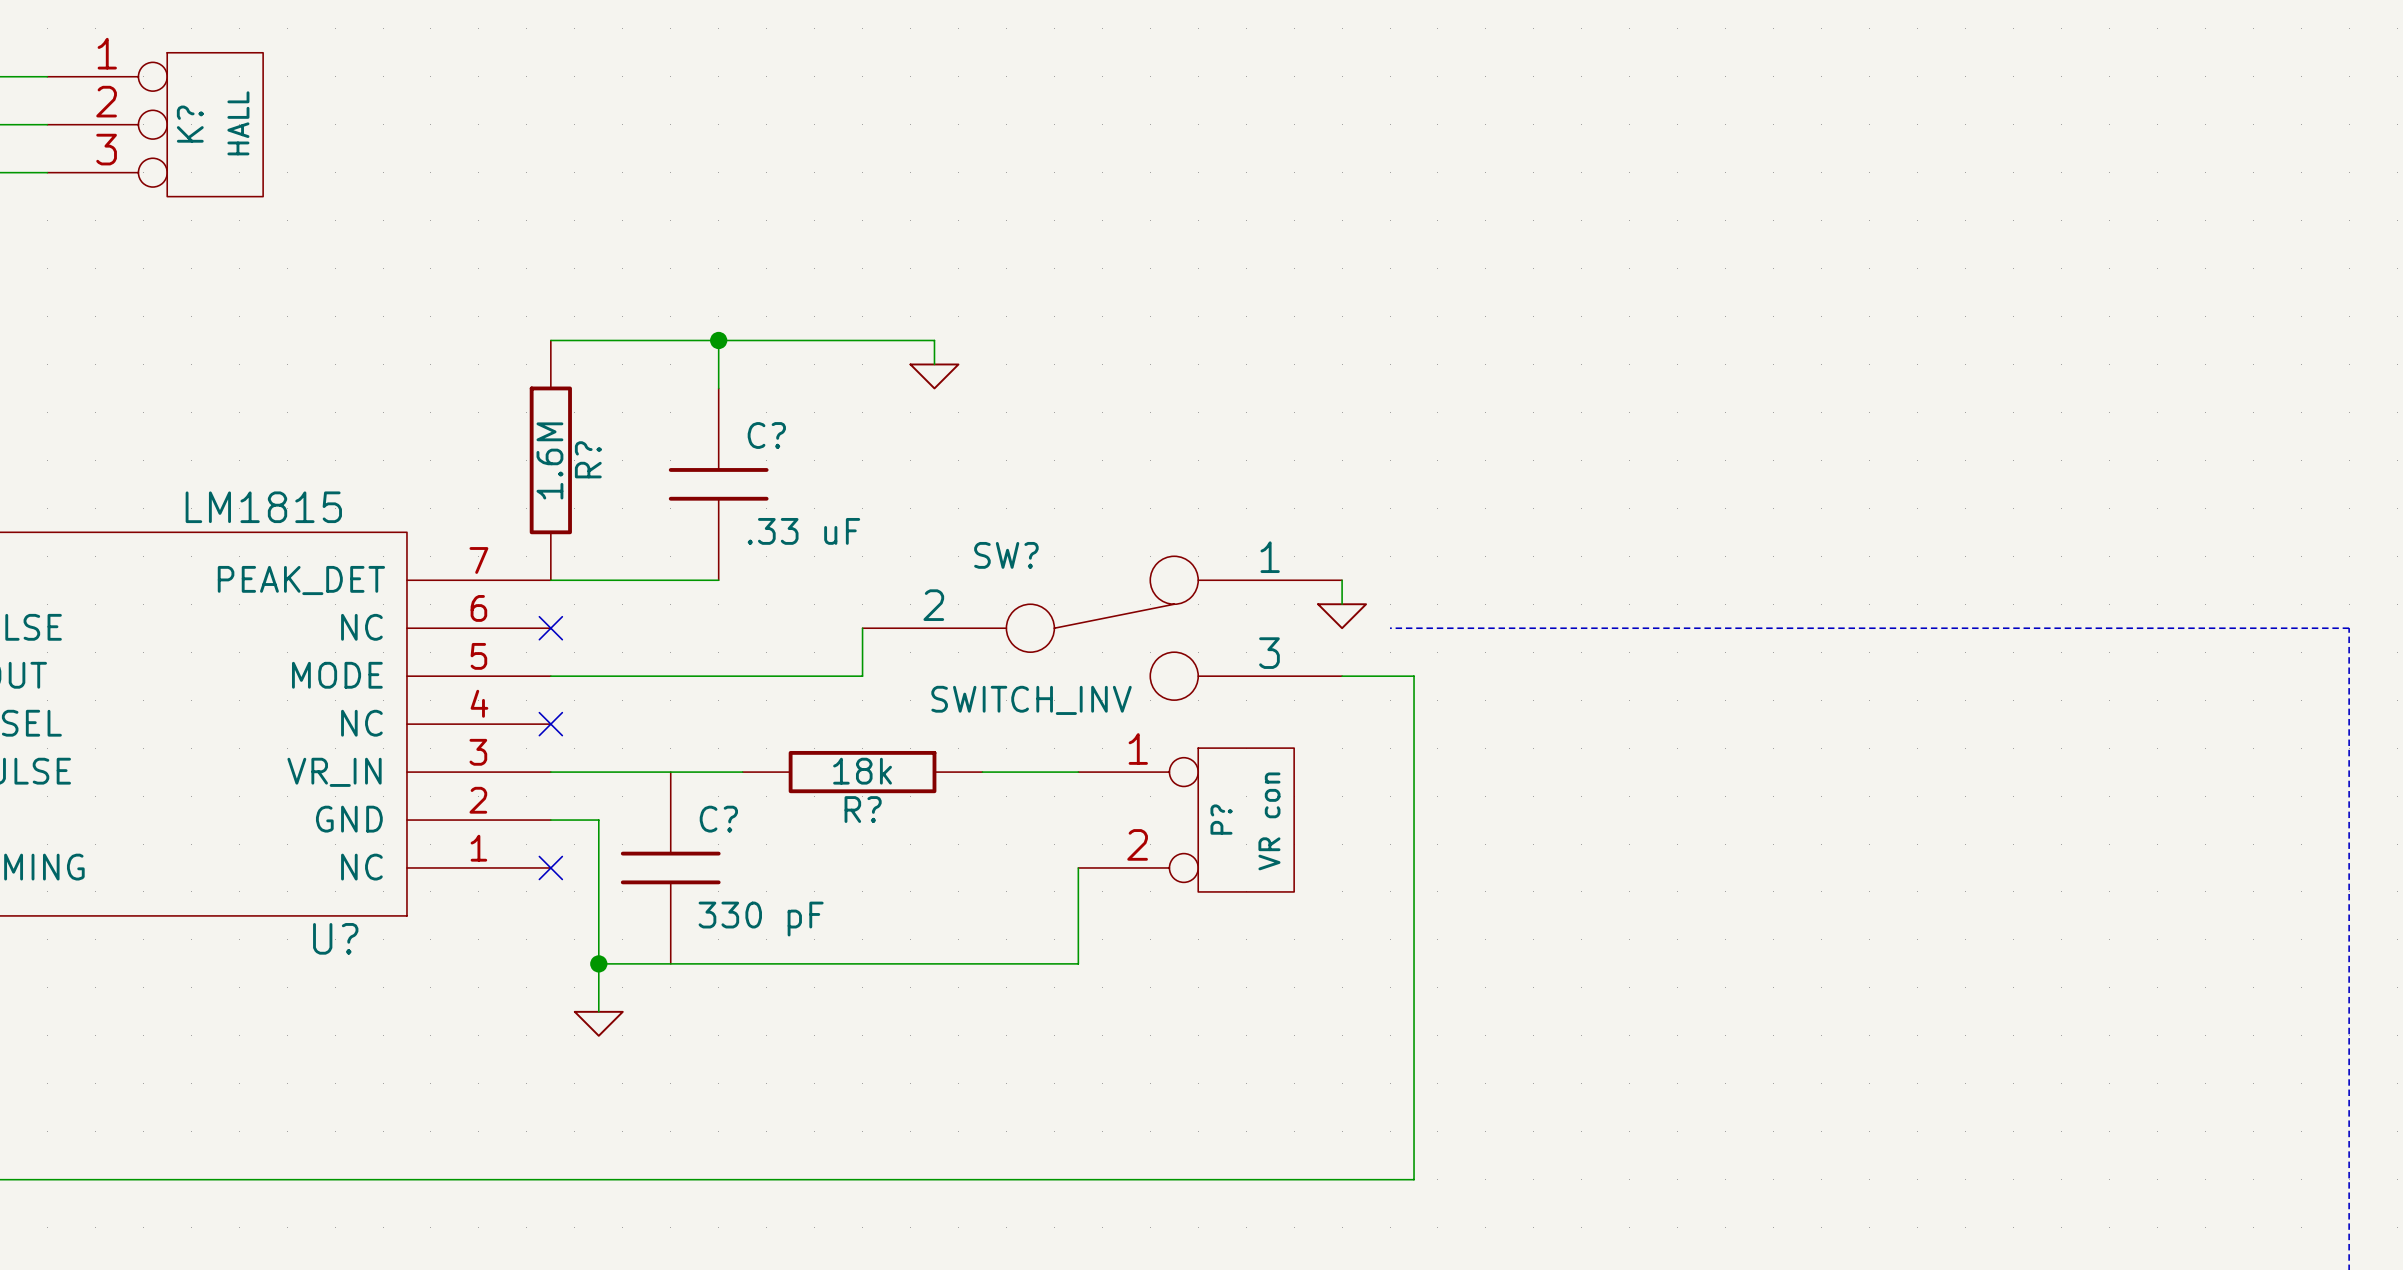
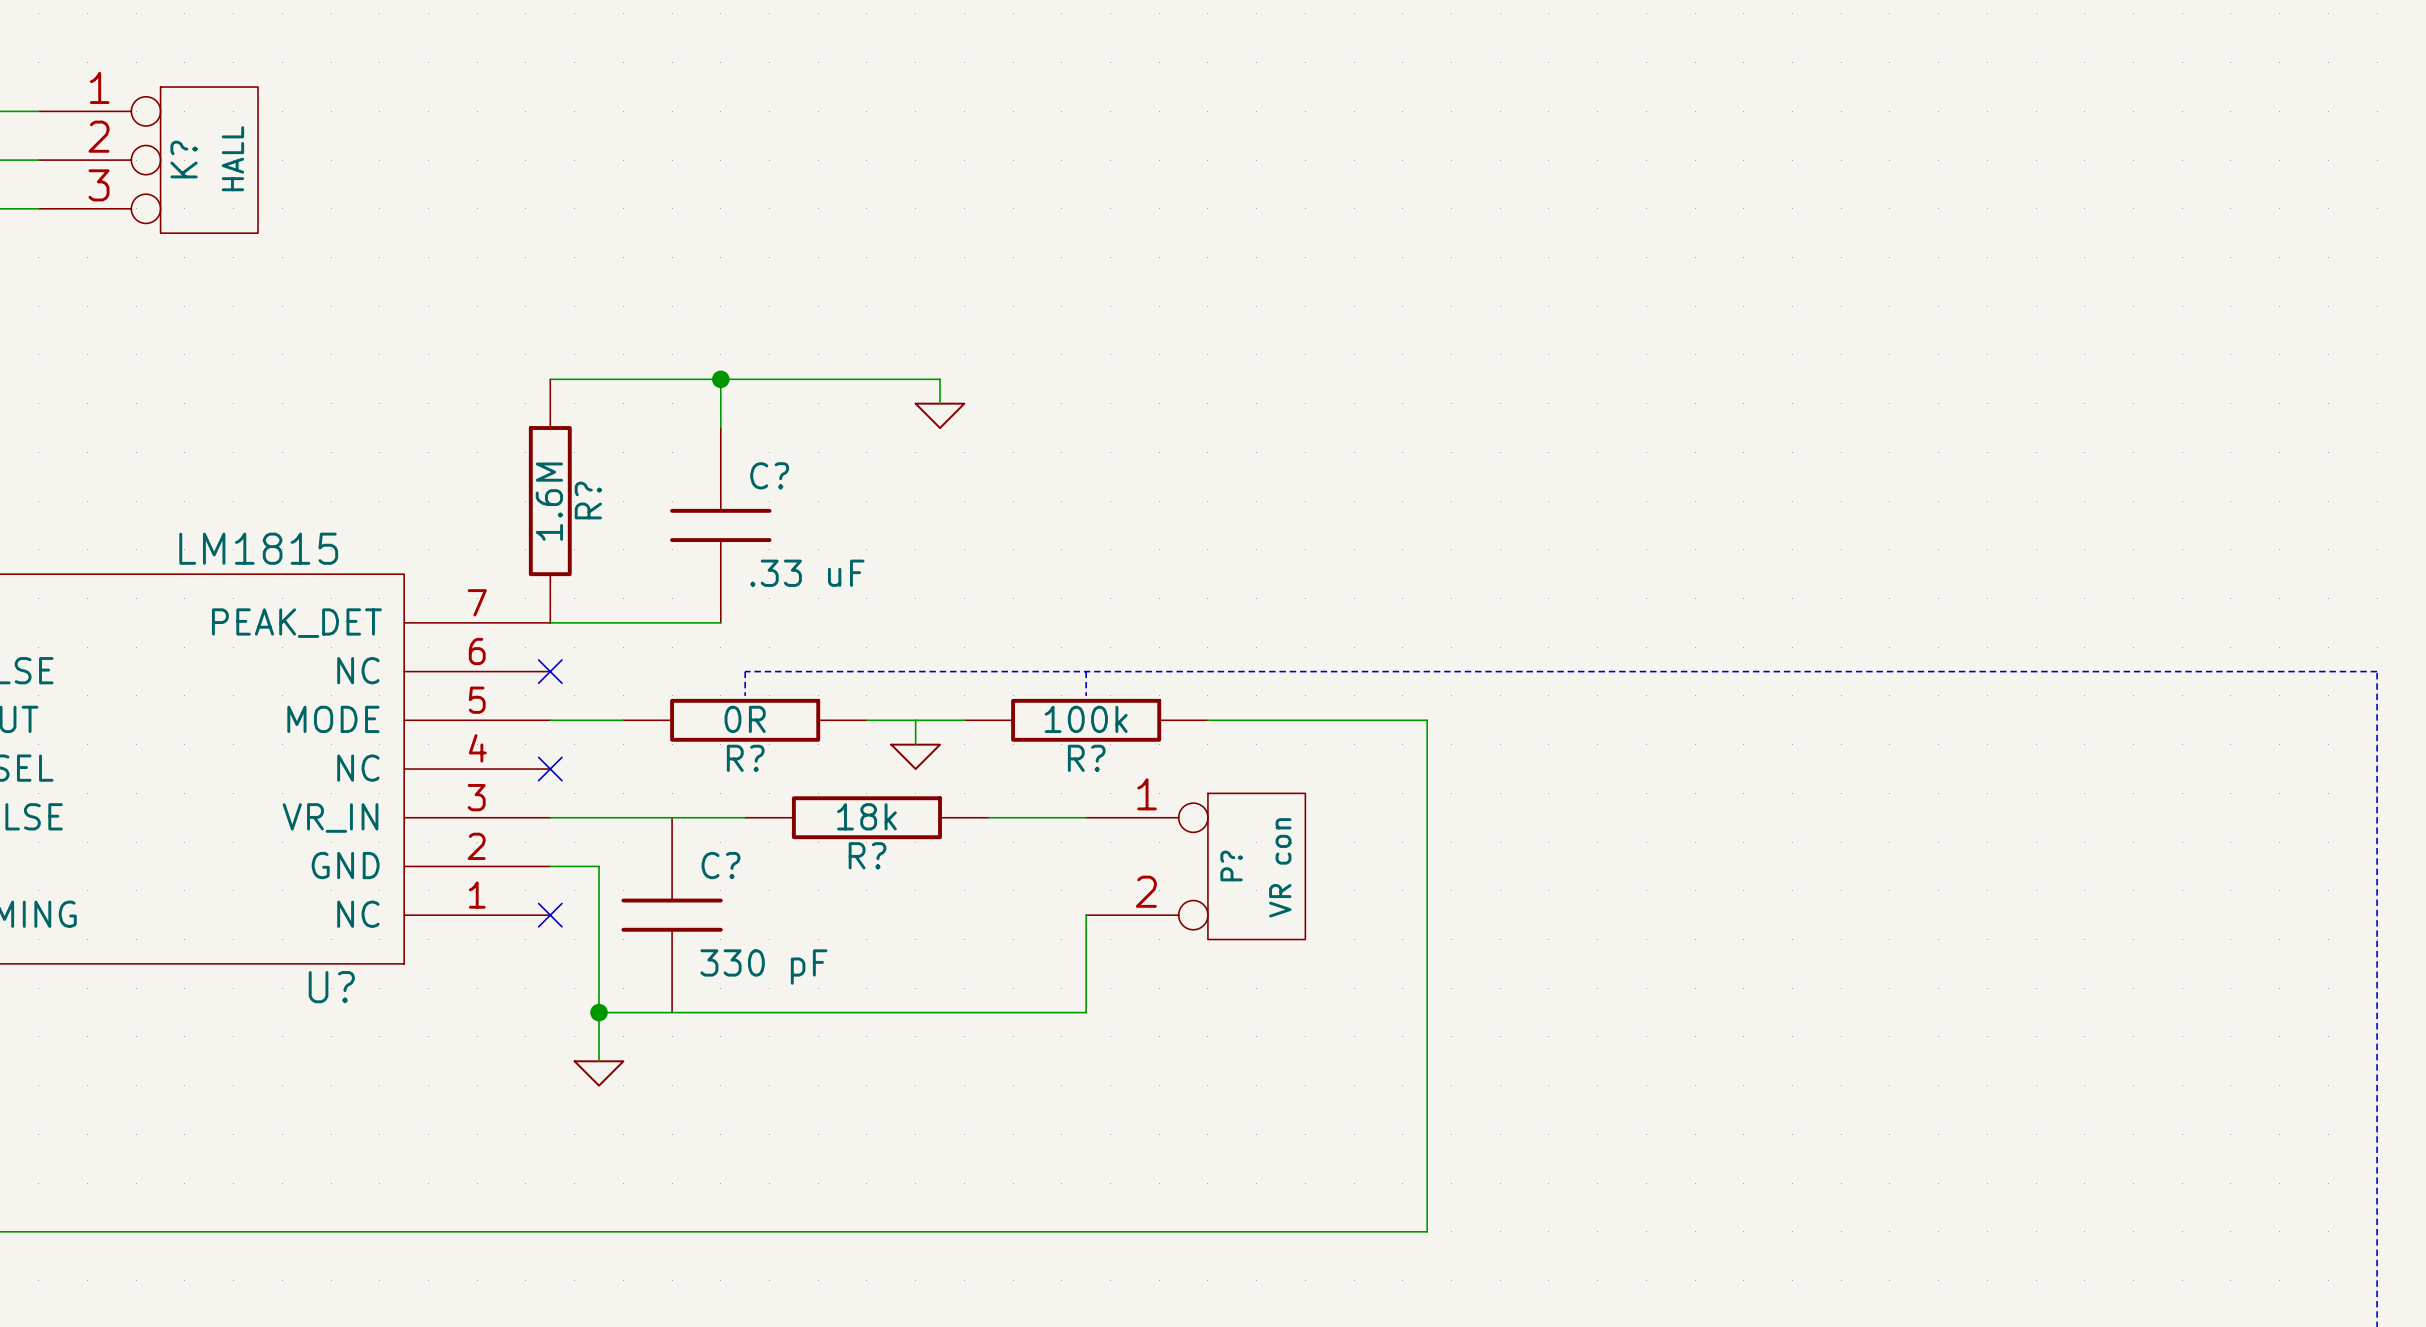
wire: (1342, 580) (1342, 604) -> (915, 720) (915, 744)
power symbol position: (1342, 616) -> (915, 756)
wire: (862, 628) (862, 676) (622, 676) -> none
line: none -> (1086, 671) (1086, 695)
SW?: SWITCH_INV (1102, 628) -> none
line: none -> (1402, 671) (745, 671) (745, 695)
R?: none -> 0R (745, 720)
wire: none -> (866, 720) (964, 720)
R?: none -> 100k (1086, 720)

